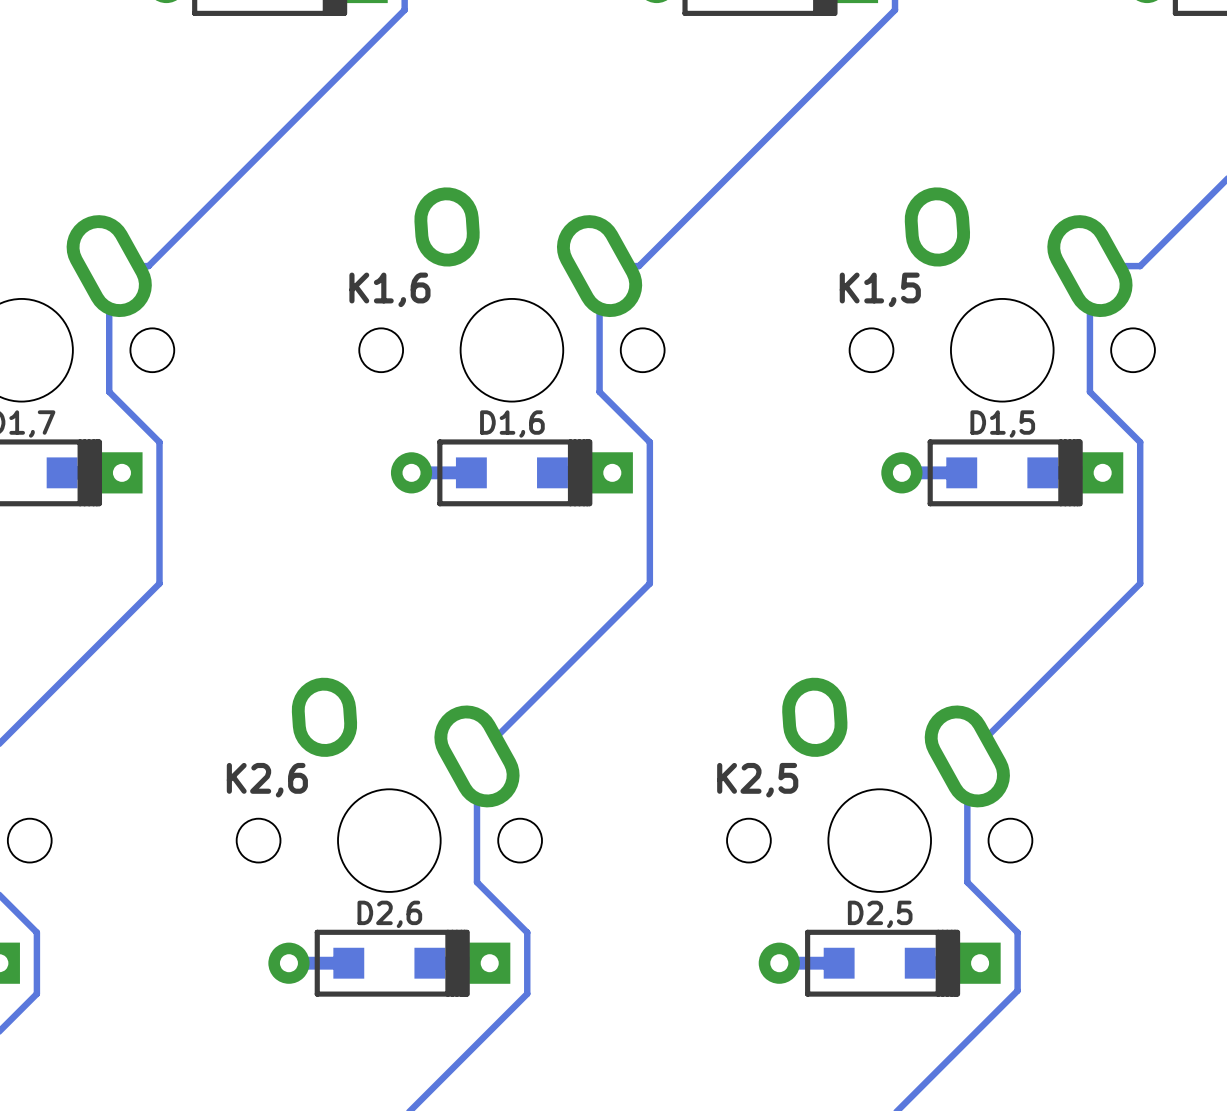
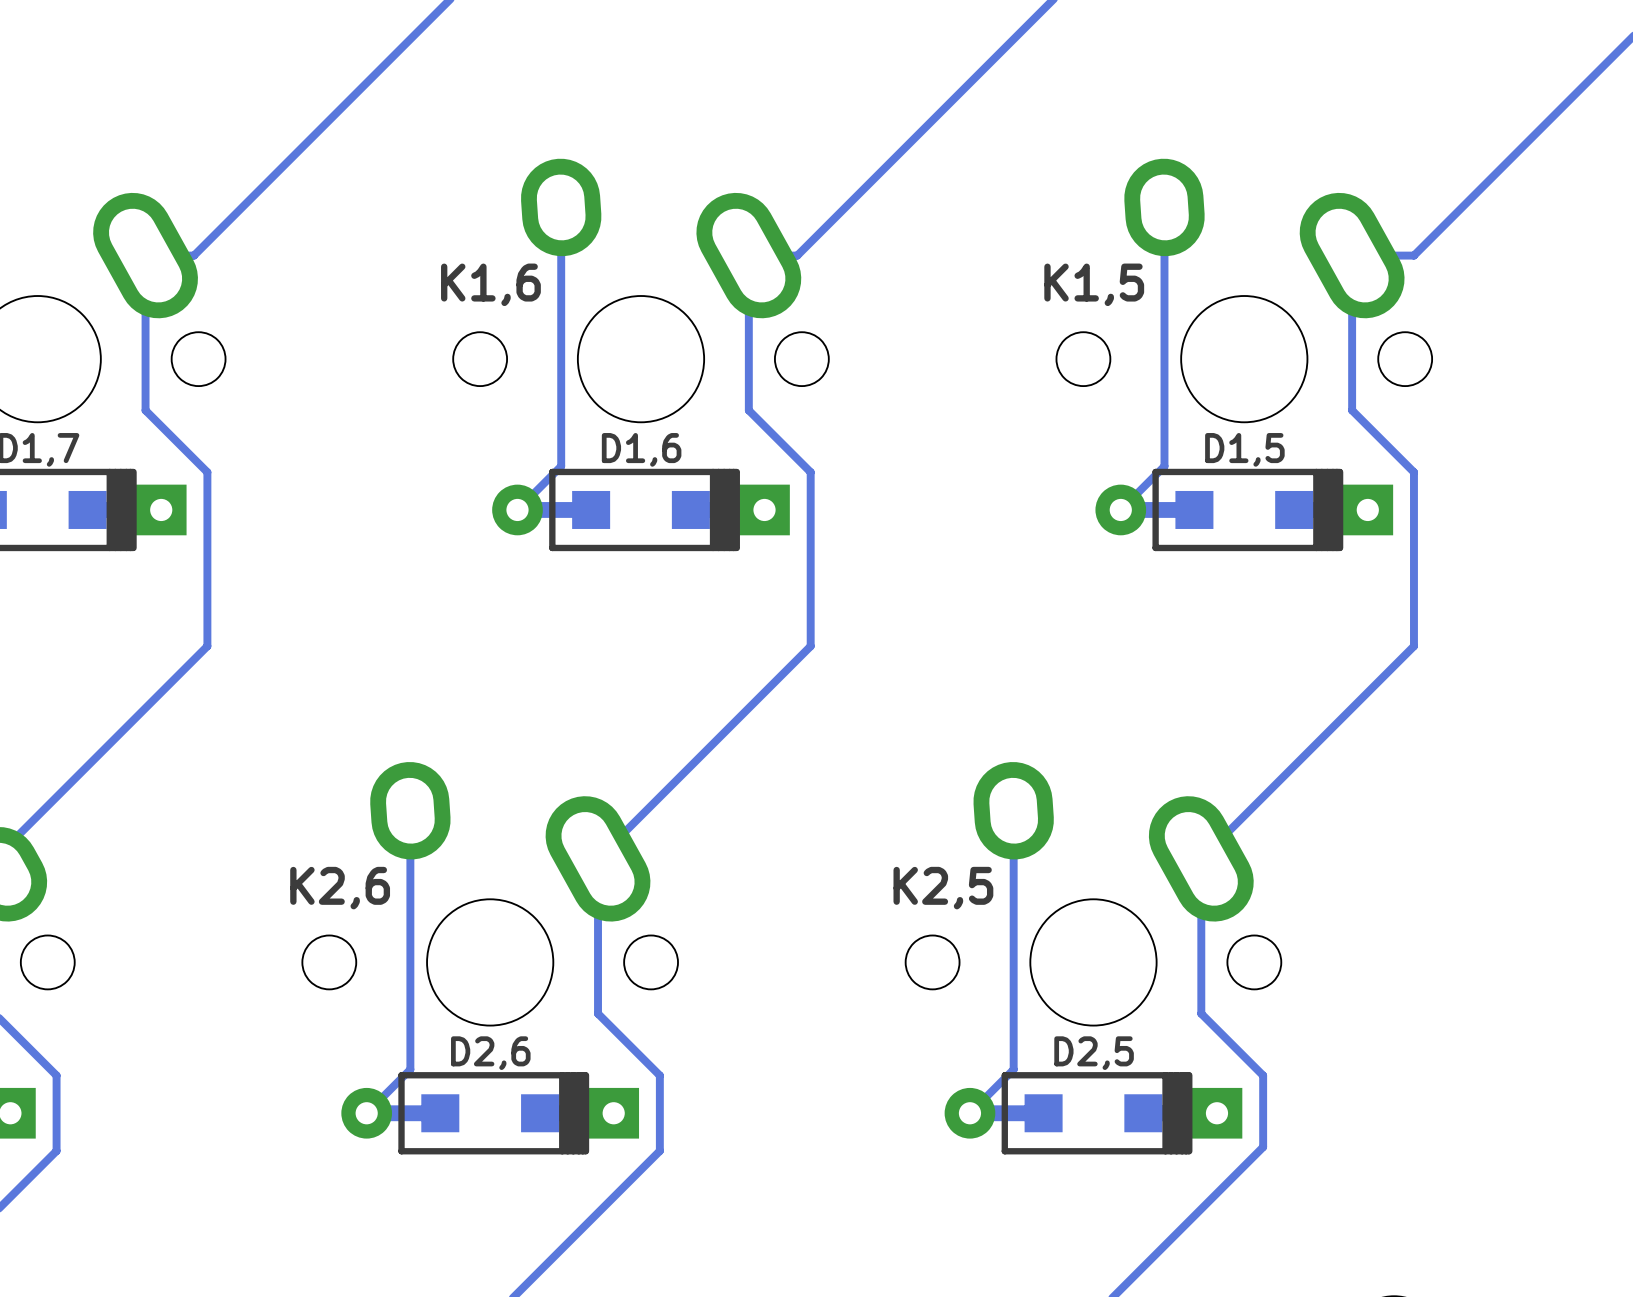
track: none -> (561, 207) (561, 466) (517, 509)
track: none -> (1164, 207) (1164, 466) (1120, 509)
track: none -> (410, 810) (410, 1069) (366, 1113)
track: none -> (1013, 810) (1013, 1069) (969, 1113)

